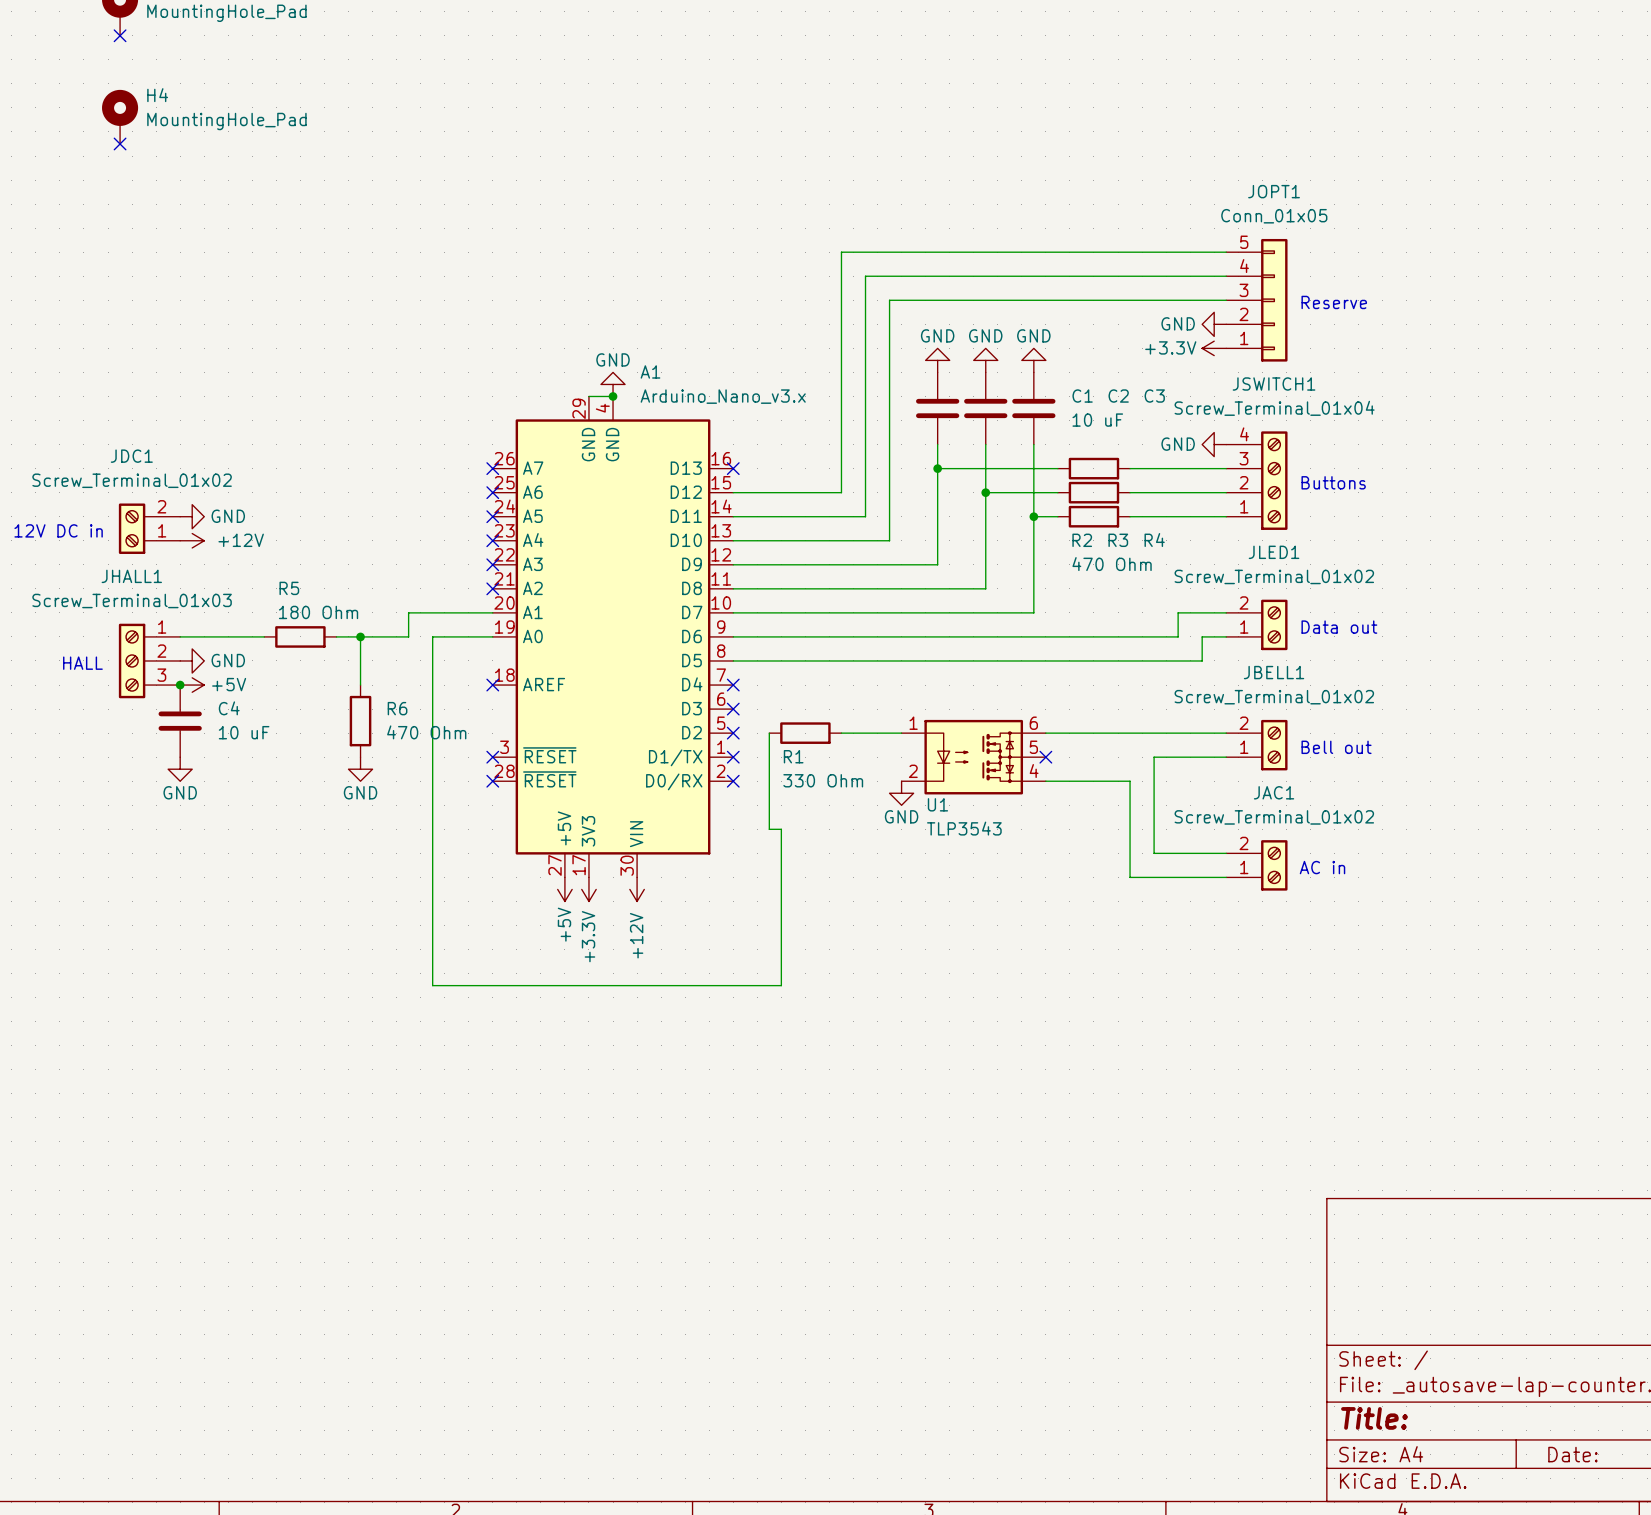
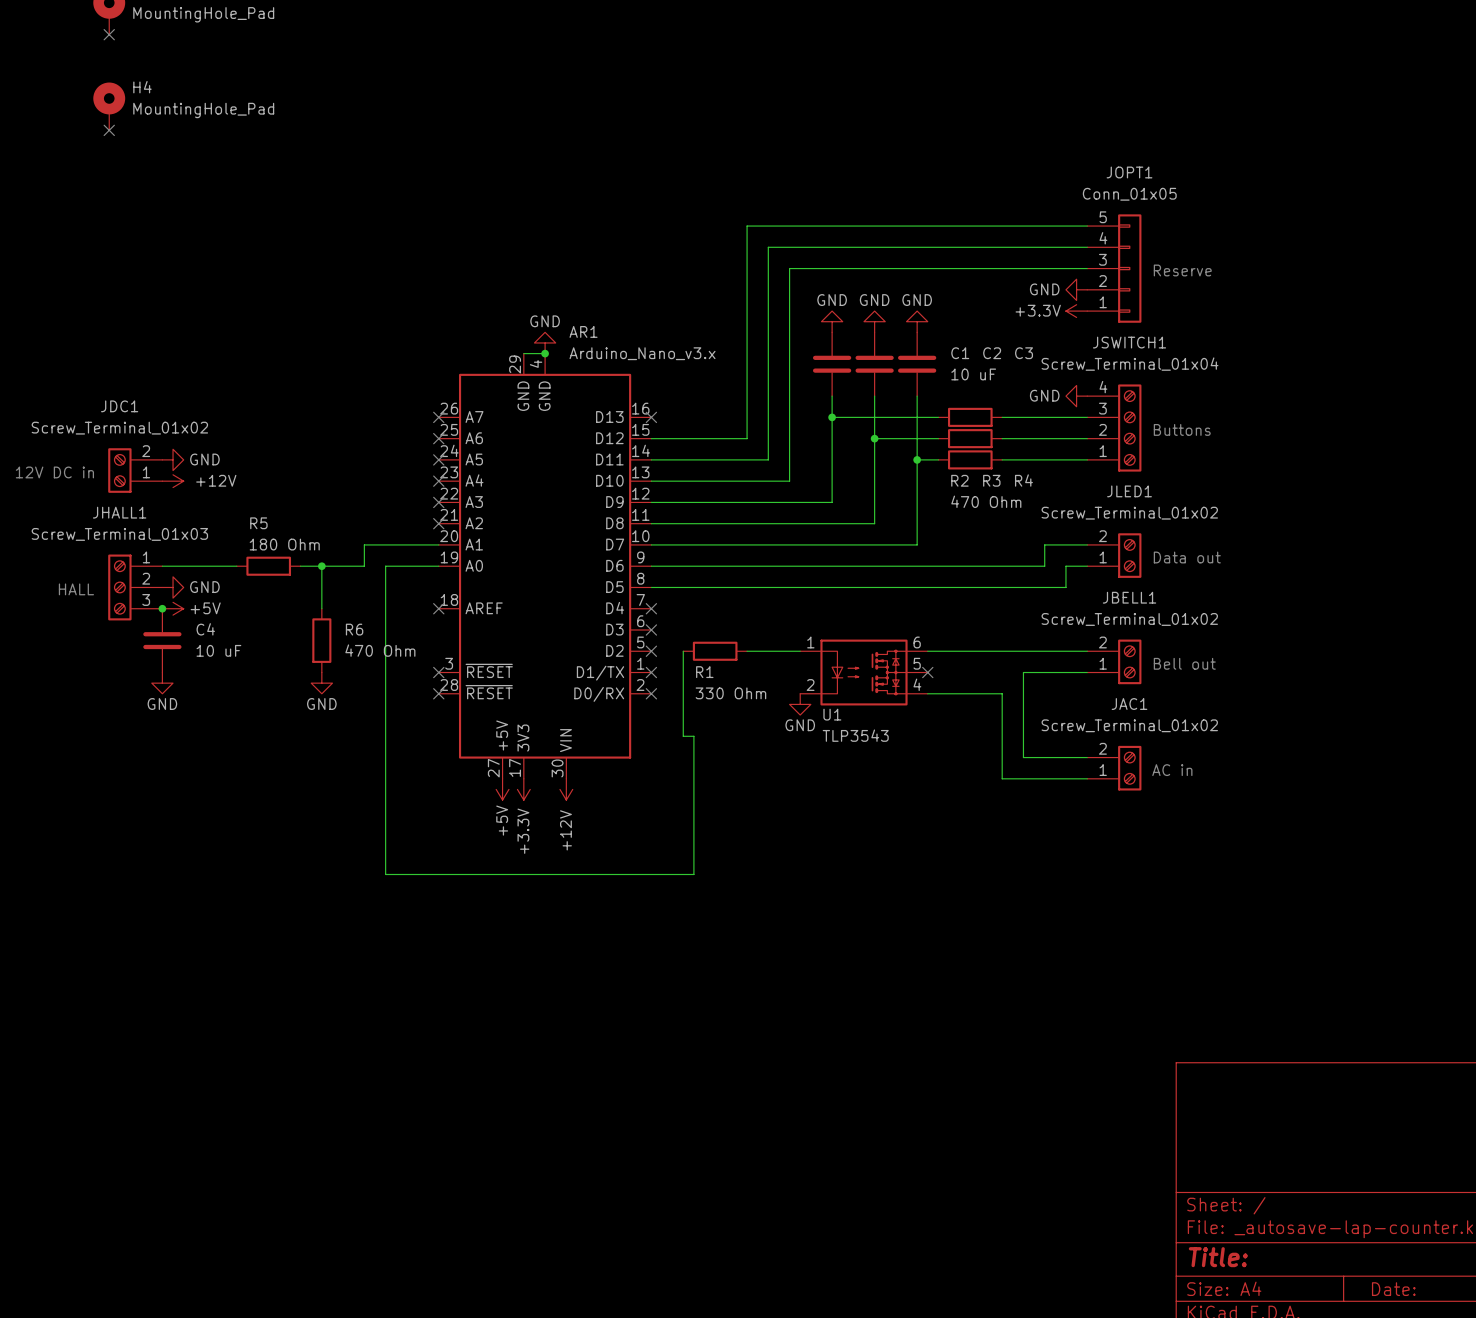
A1 name: A1 (650, 371) -> AR1 (583, 331)

